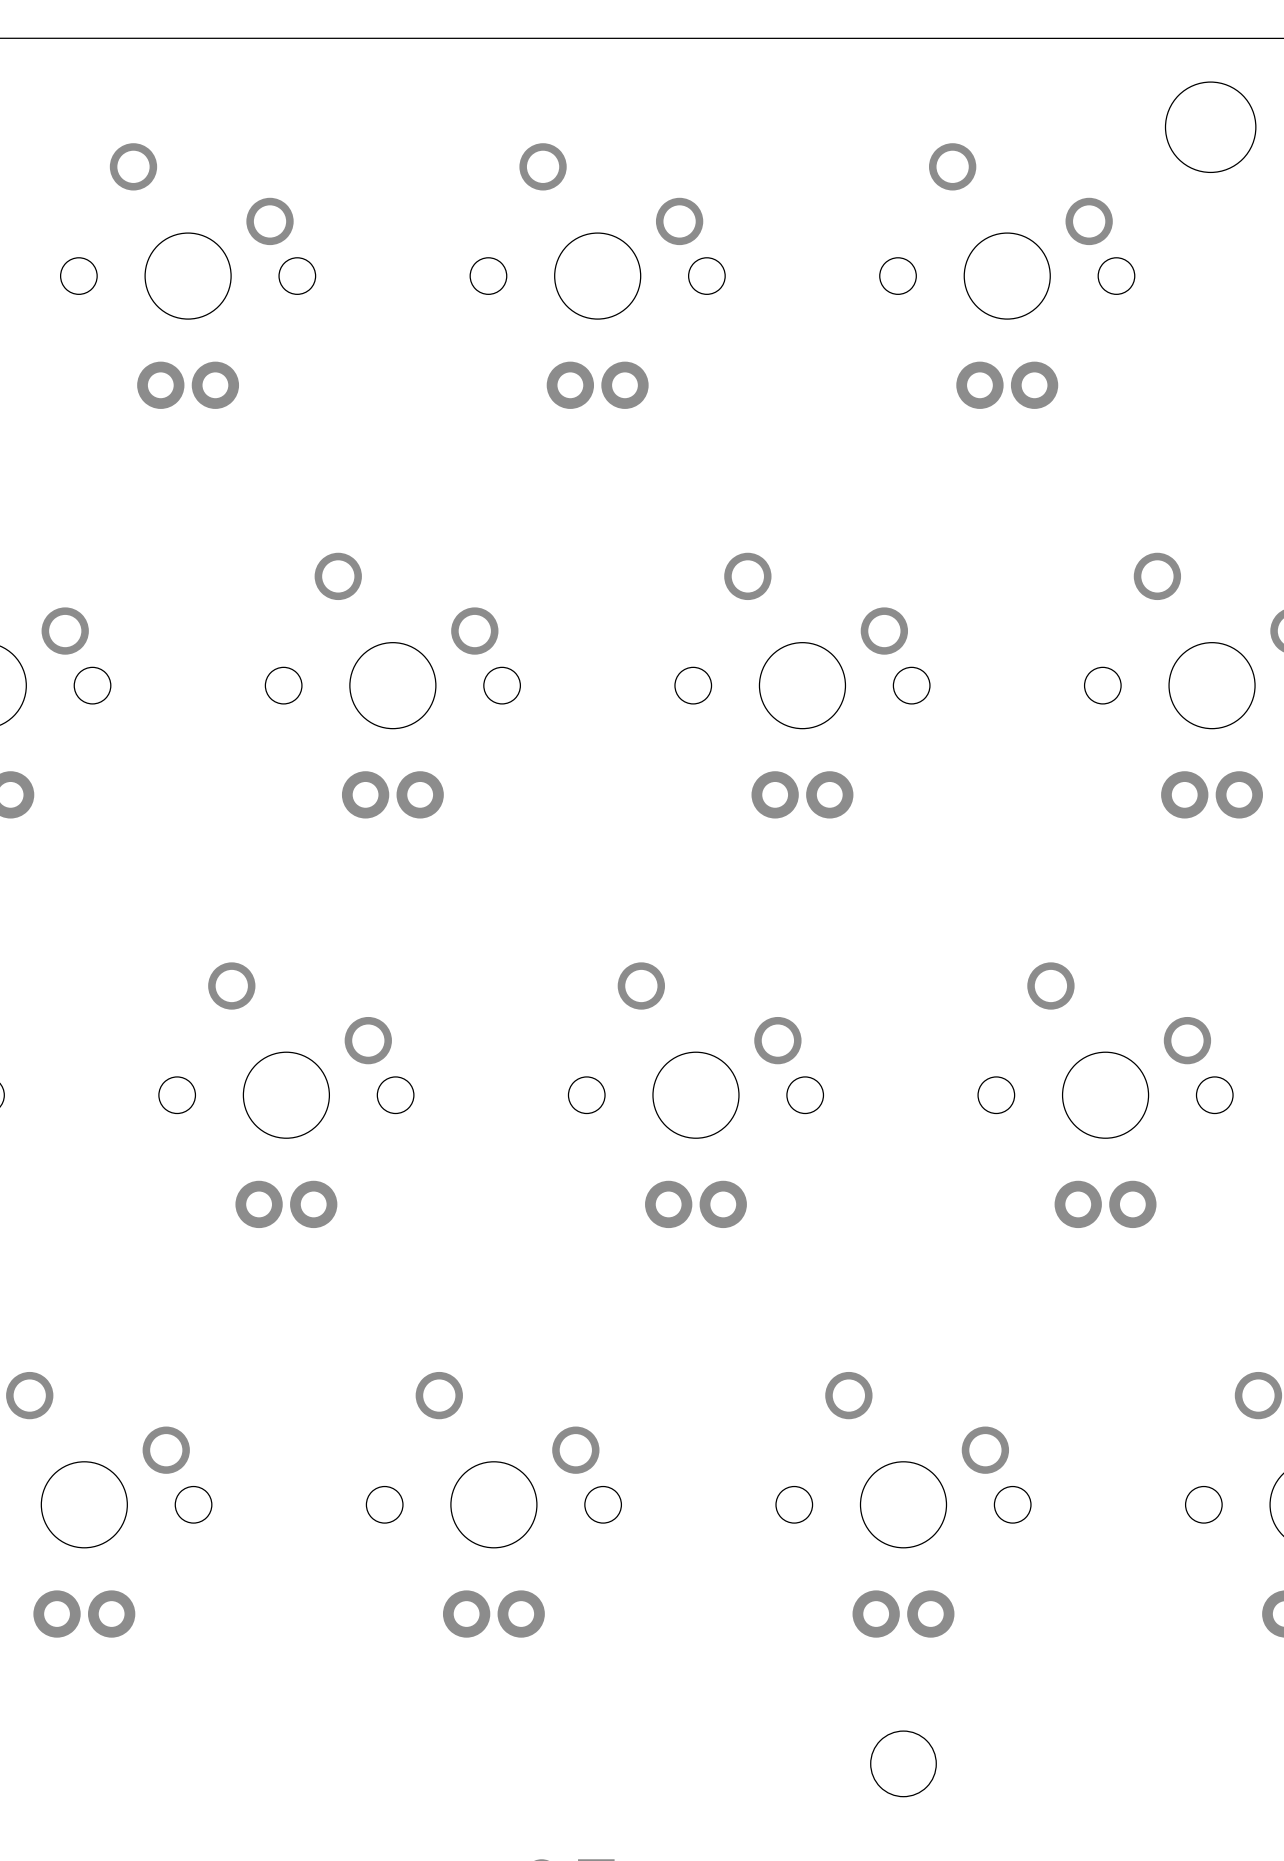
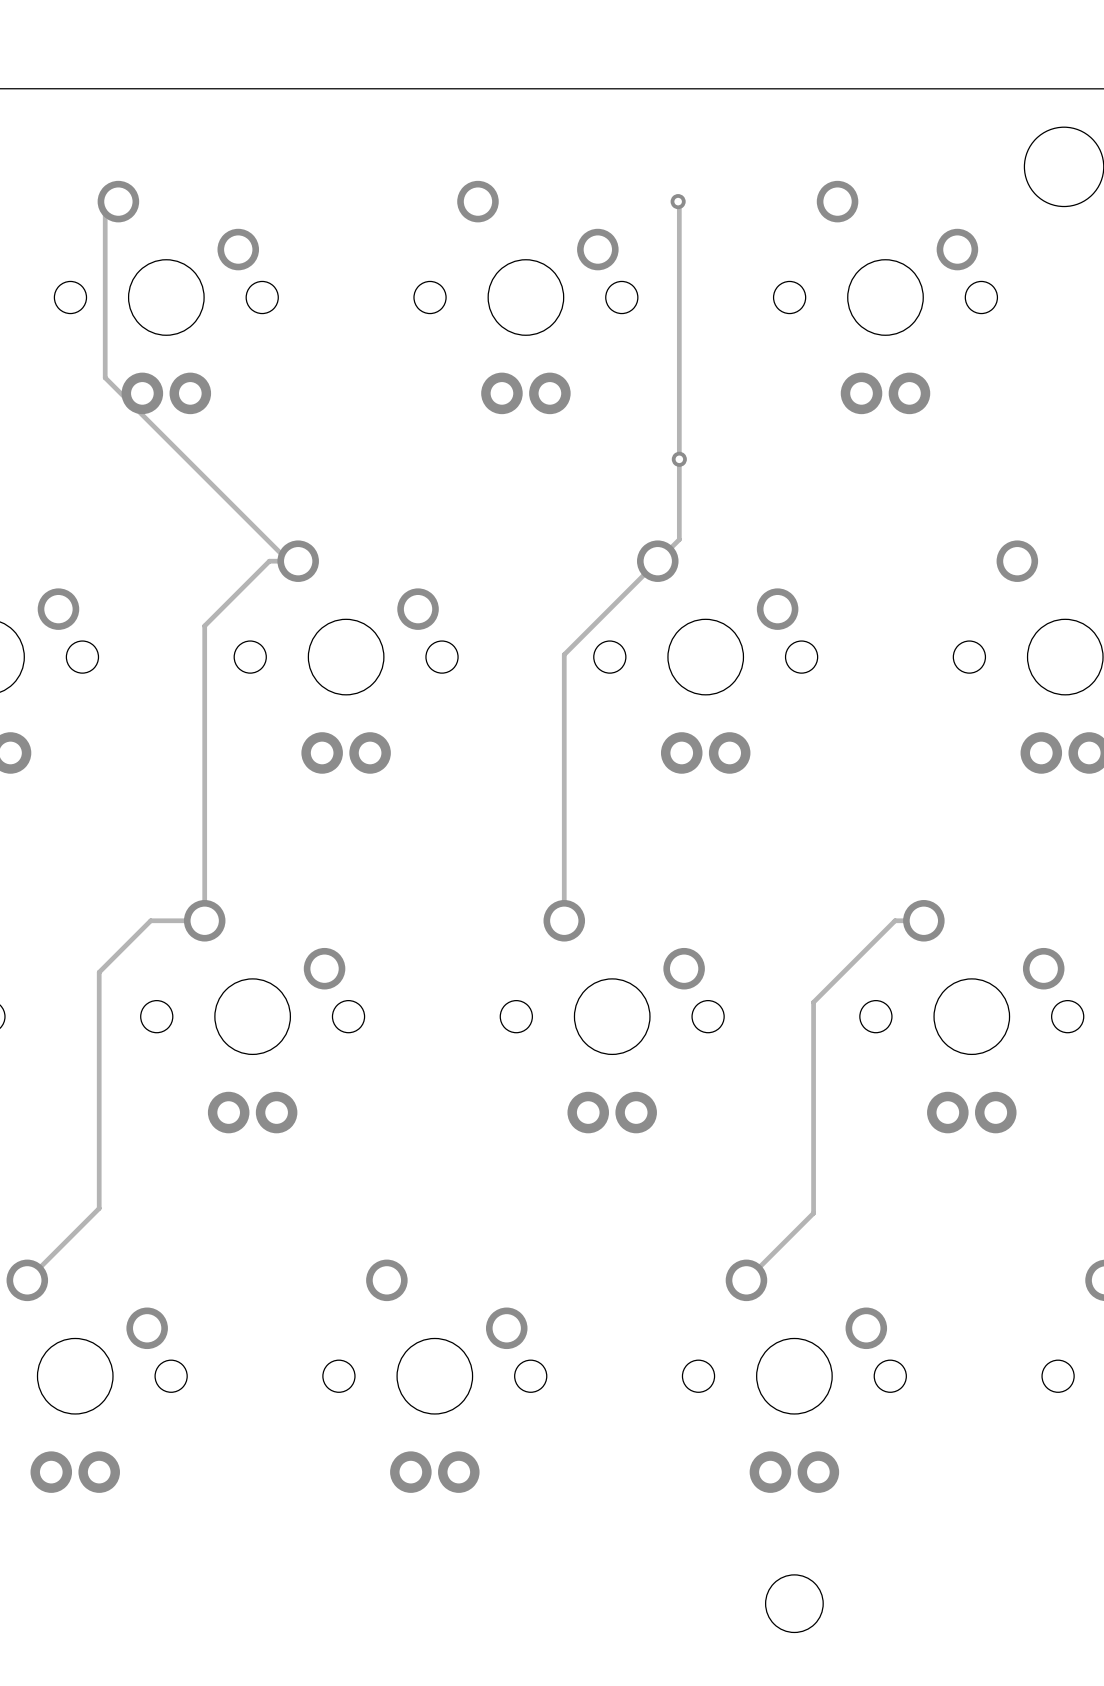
track: none -> (118, 201) (105, 214) (105, 377) (288, 561)
track: none -> (678, 201) (679, 539) (564, 654) (564, 920)
via: none -> (678, 201)
via: none -> (679, 459)
track: none -> (298, 561) (269, 561) (204, 625) (204, 920) (150, 920) (99, 972) (99, 1208) (27, 1280)
track: none -> (923, 920) (895, 920) (813, 1002) (813, 1213) (746, 1280)

